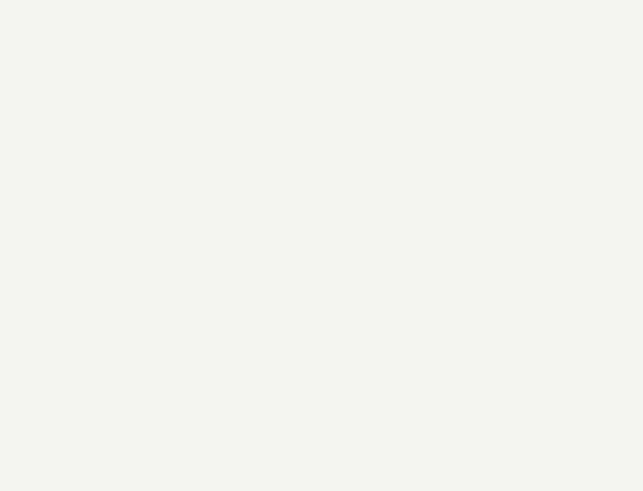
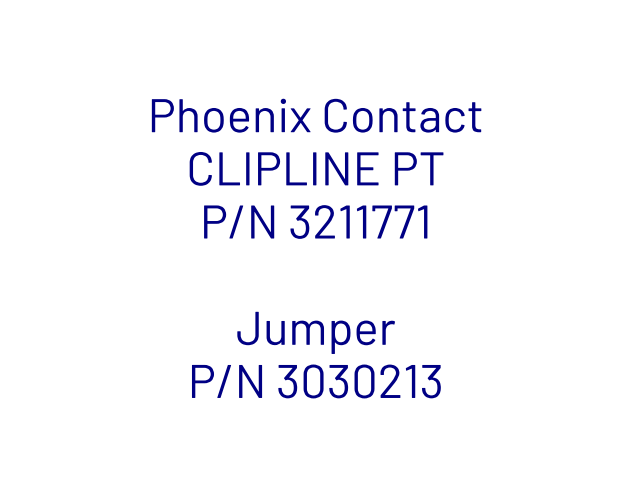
text: none -> Phoenix Contact (316, 115)
text: none -> CLIPLINE PT (316, 168)
text: none -> P/N 3211771 (315, 222)
text: none -> Jumper (316, 332)
text: none -> P/N 3030213 (316, 381)

